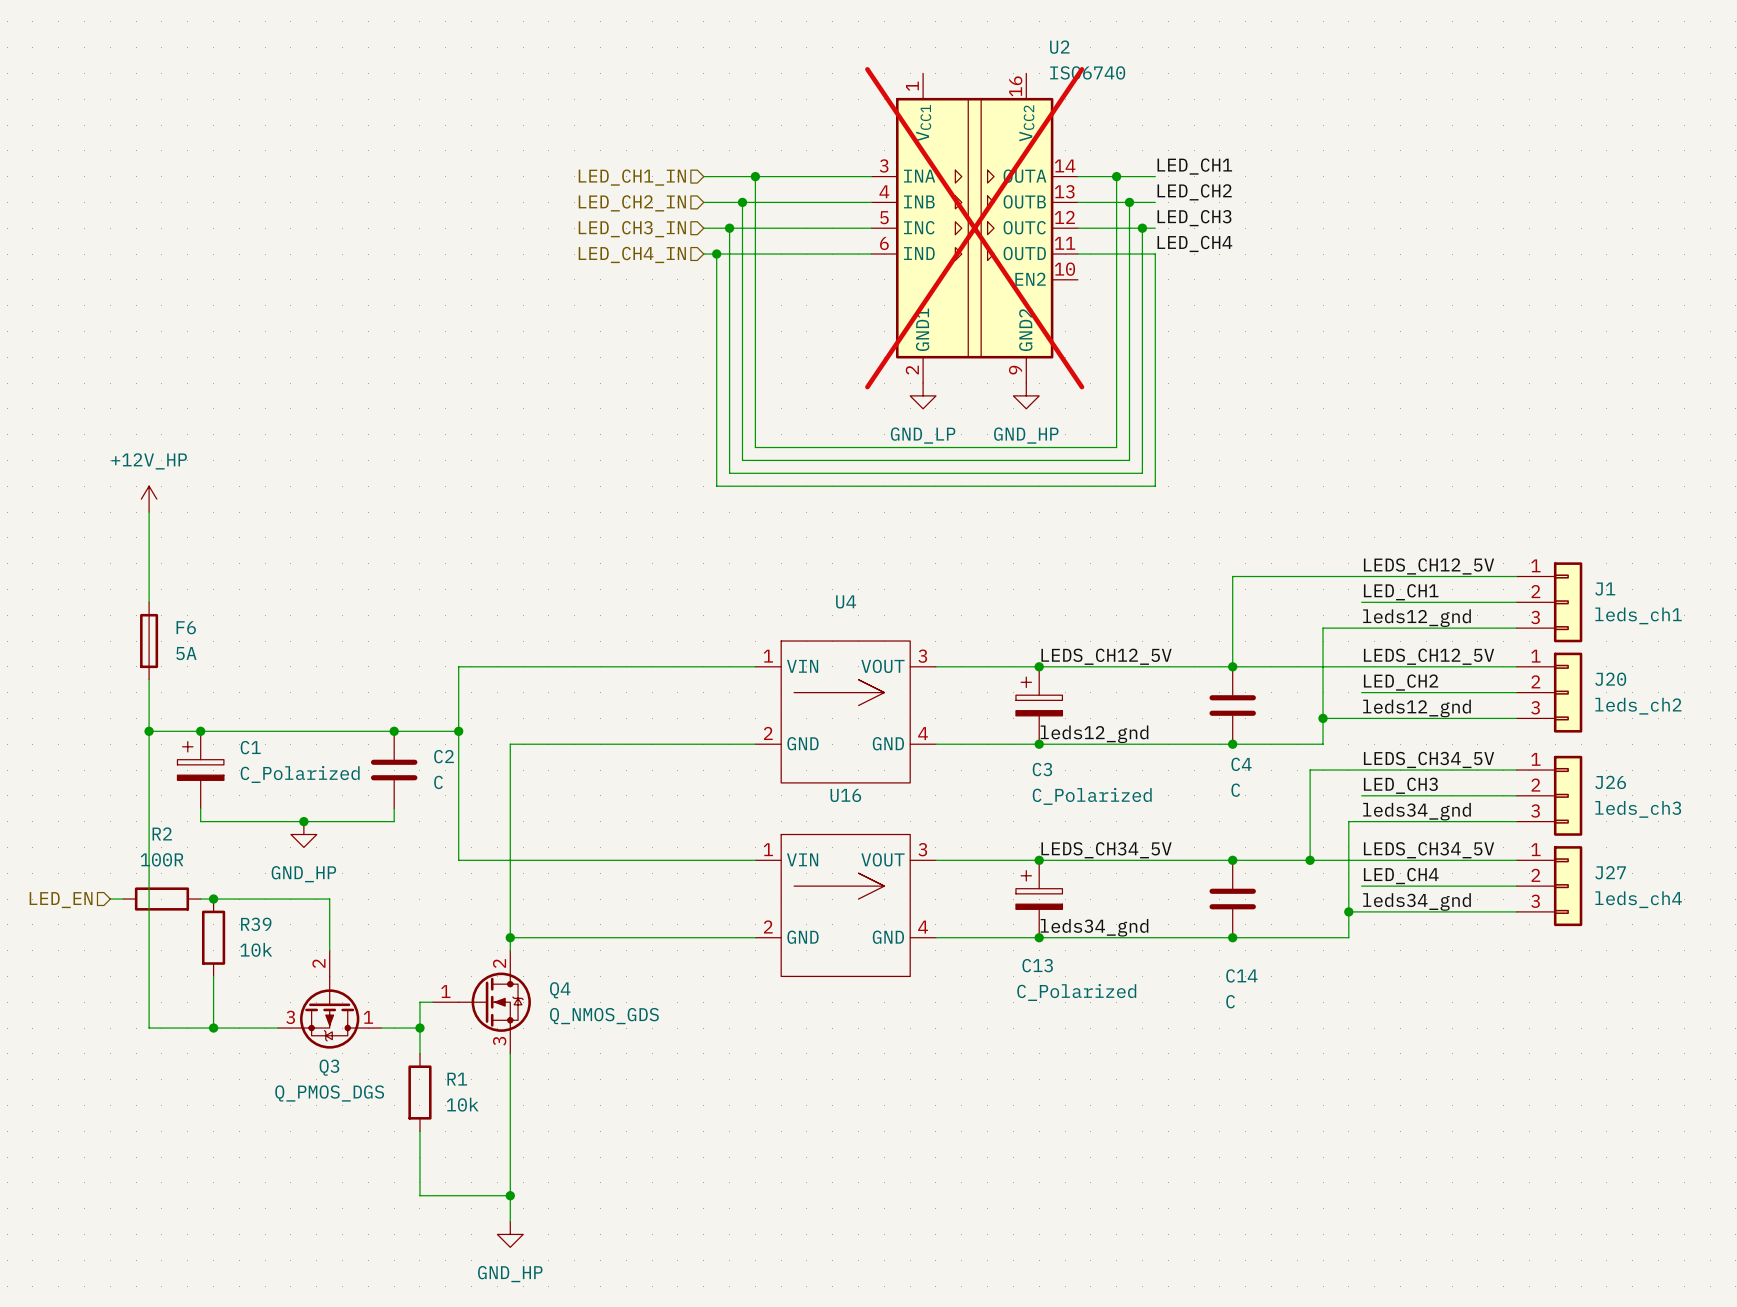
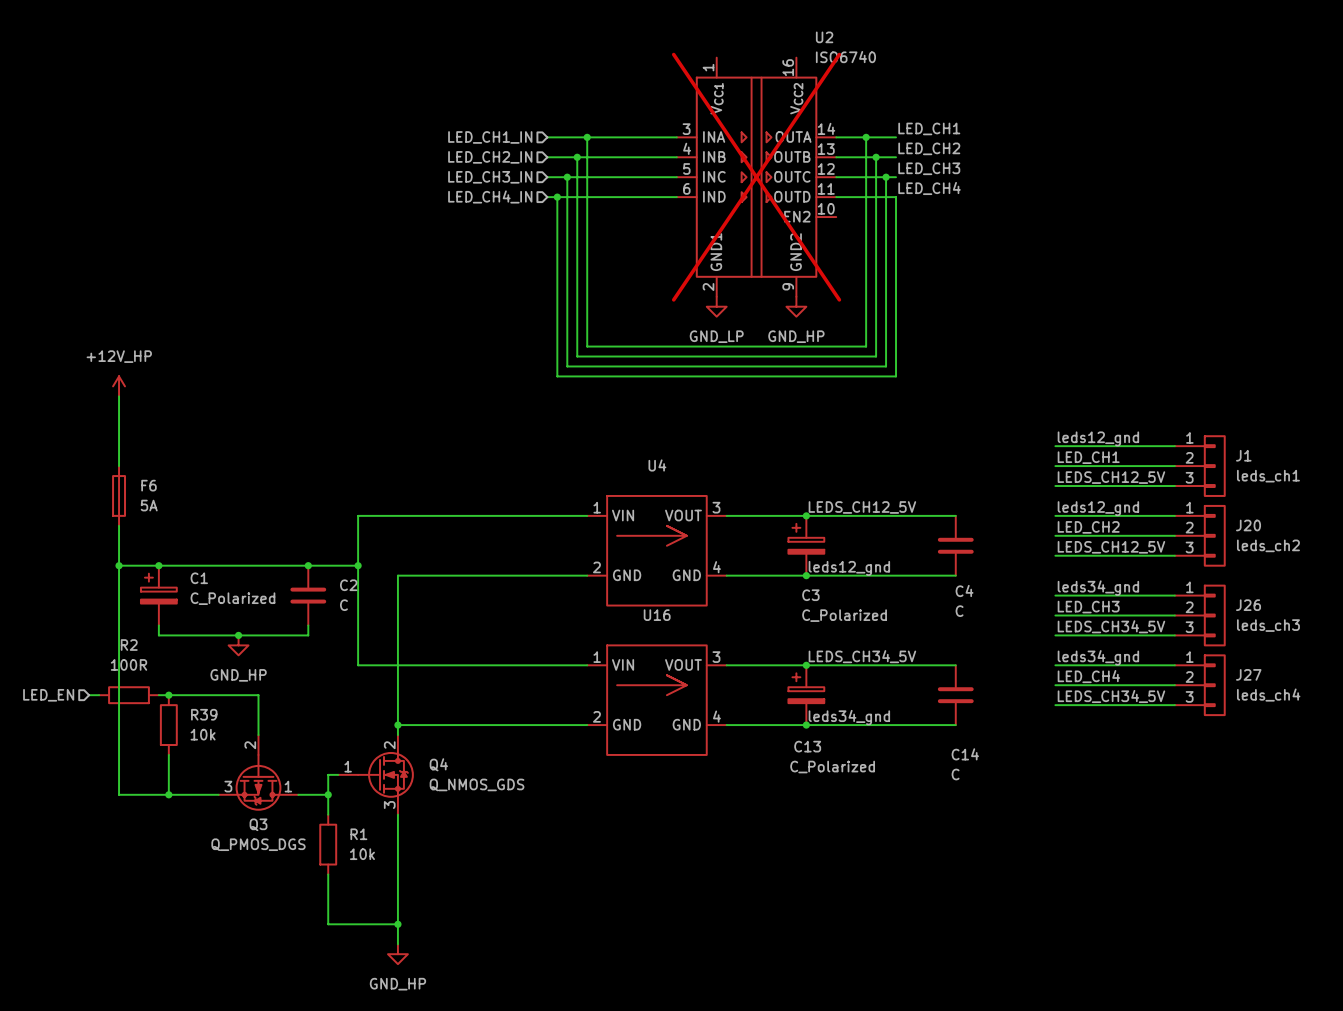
label: LEDS_CH12_5V (1429, 566) -> leds12_gnd (1098, 438)
wire: (1361, 576) (1232, 576) (1232, 666) (1361, 666) -> none
label: leds12_gnd (1417, 618) -> LEDS_CH12_5V (1111, 477)
wire: (1361, 628) (1323, 628) (1323, 744) (1232, 744) -> none
label: LEDS_CH12_5V (1429, 656) -> leds12_gnd (1098, 508)
junction: (1232, 666) -> none
label: leds12_gnd (1417, 708) -> LEDS_CH12_5V (1111, 547)
wire: (1323, 718) (1361, 718) -> none
junction: (1323, 718) -> none
junction: (1232, 744) -> none
label: LEDS_CH34_5V (1429, 759) -> leds34_gnd (1098, 588)
wire: (1361, 770) (1310, 770) (1310, 860) -> none
label: leds34_gnd (1417, 811) -> LEDS_CH34_5V (1111, 626)
wire: (1361, 821) (1348, 821) (1348, 937) (1232, 937) -> none
label: LEDS_CH34_5V (1429, 850) -> leds34_gnd (1098, 657)
wire: (1232, 860) (1361, 860) -> none
junction: (1232, 860) -> none
junction: (1310, 860) -> none
label: leds34_gnd (1417, 901) -> LEDS_CH34_5V (1111, 696)
wire: (1348, 911) (1361, 911) -> none
junction: (1348, 911) -> none
junction: (1232, 937) -> none

